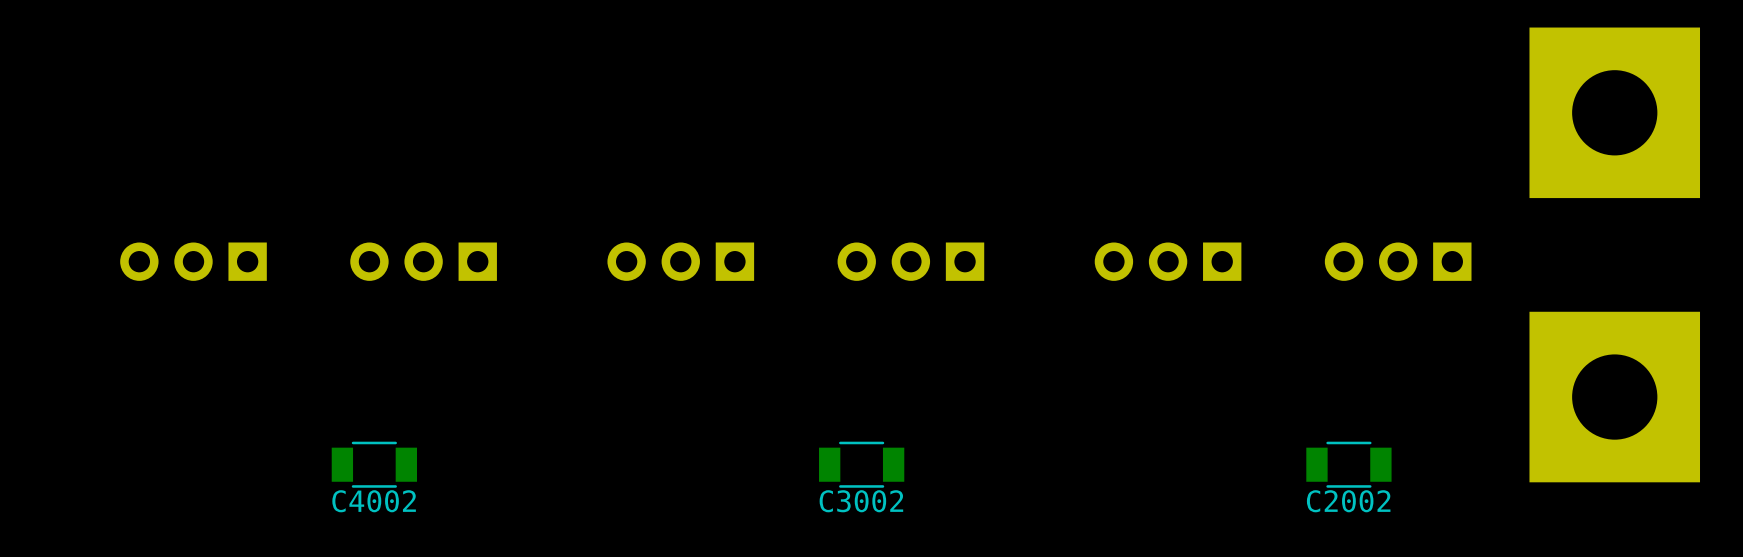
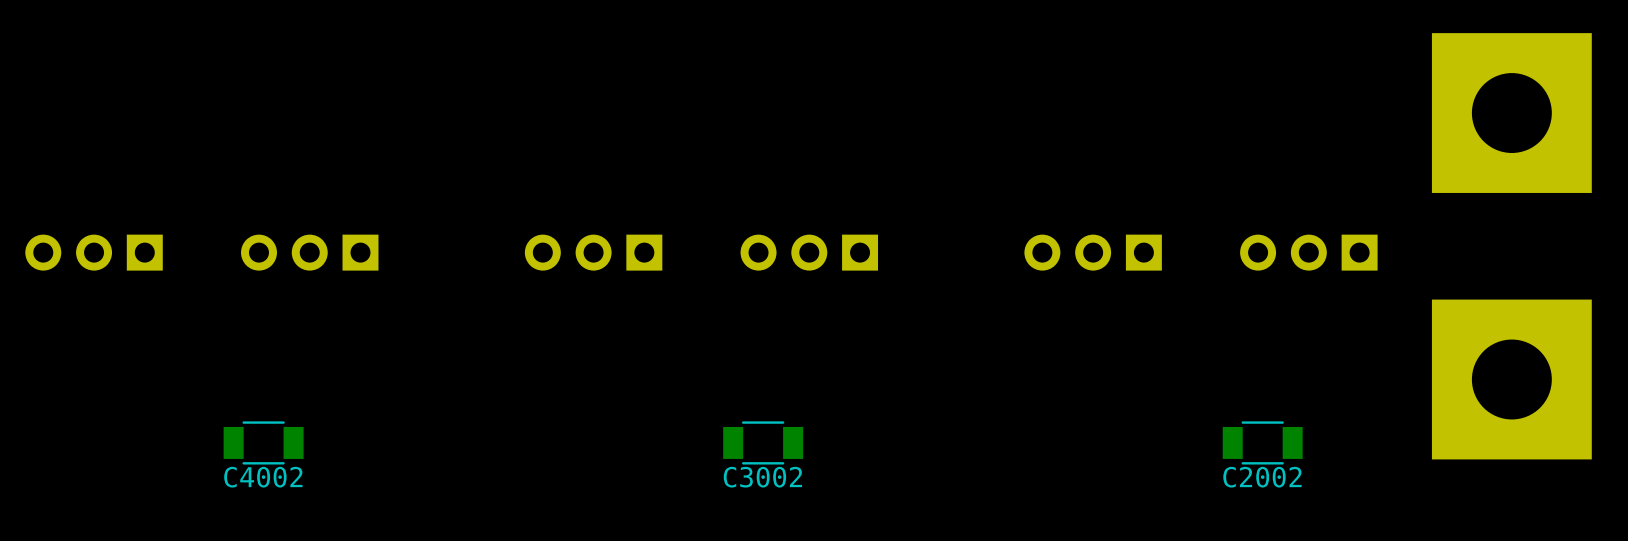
part: none -> (94, 252)
part: (193, 261) -> none
part: none -> (309, 252)
part: (423, 261) -> none
part position: (680, 261) -> (593, 252)
part position: (910, 261) -> (809, 252)
C4002 position: (374, 464) -> (263, 442)
C3002 position: (861, 464) -> (763, 442)

